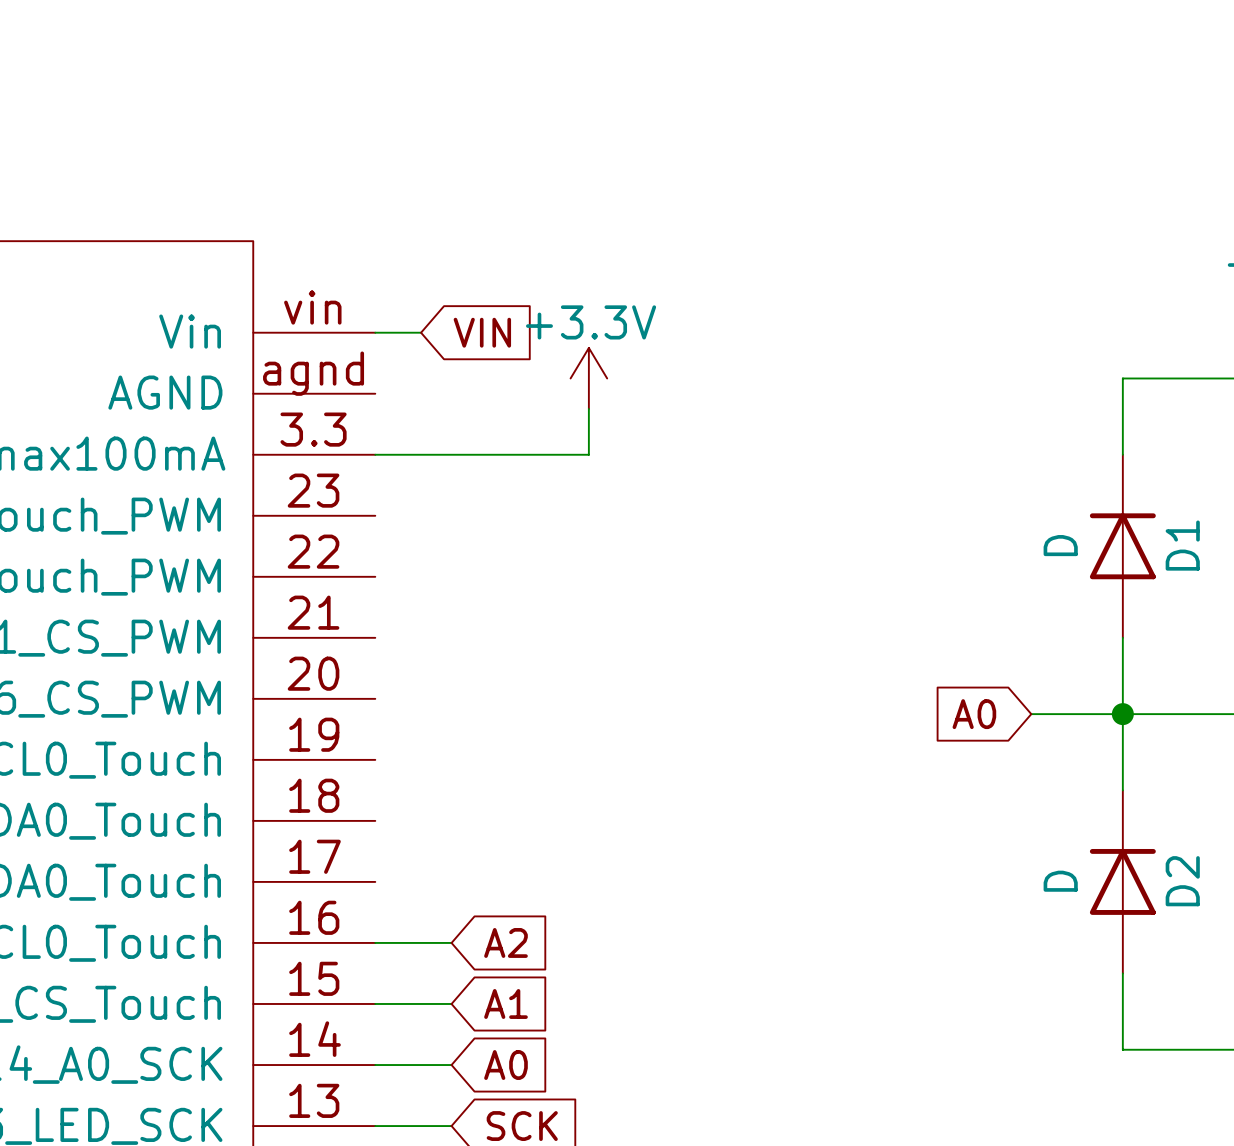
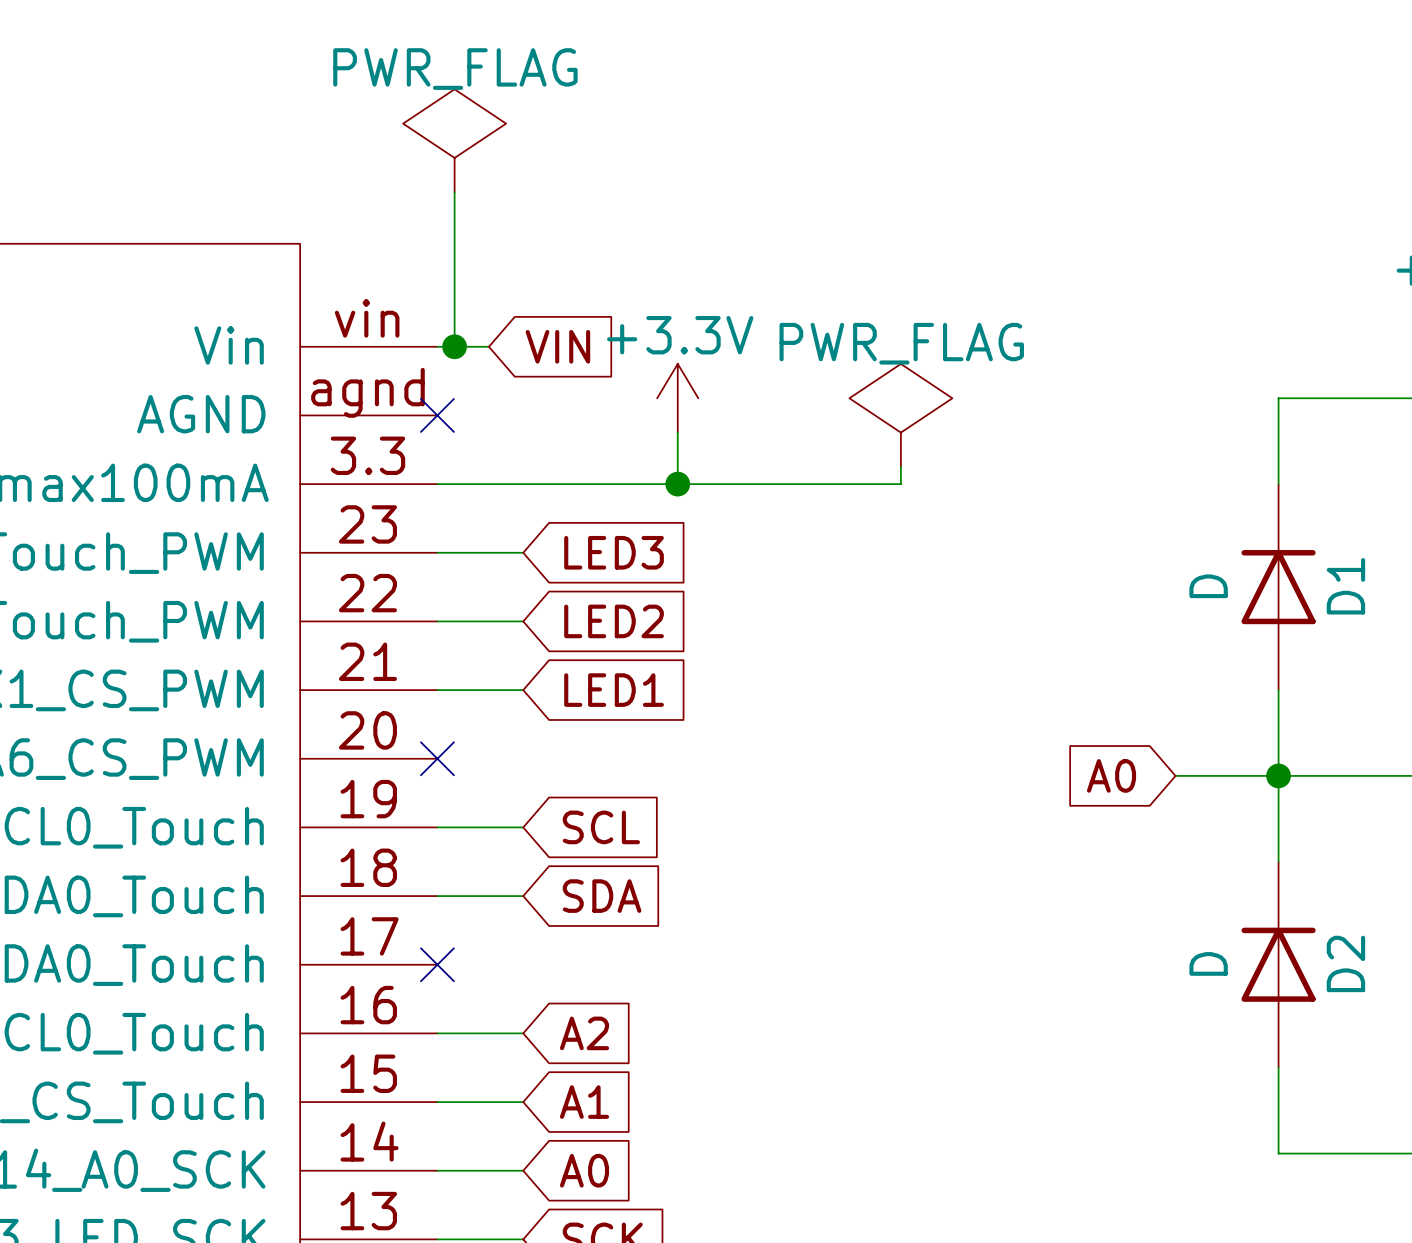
power symbol: none -> PWR_FLAG (454, 140)
wire: none -> (454, 192) (454, 346)
junction: none -> (454, 346)
no-connect mark: none -> (437, 415)
power symbol: none -> PWR_FLAG (900, 415)
wire: none -> (900, 466) (900, 484) (677, 484)
junction: none -> (677, 484)
wire: none -> (437, 552) (523, 552)
global label: none -> LED3 (614, 552)
wire: none -> (437, 621) (523, 621)
global label: none -> LED2 (614, 621)
wire: none -> (437, 690) (523, 690)
global label: none -> LED1 (614, 690)
no-connect mark: none -> (437, 758)
wire: none -> (437, 827) (523, 827)
global label: none -> SCL (601, 827)
wire: none -> (437, 896) (523, 896)
global label: none -> SDA (602, 896)
no-connect mark: none -> (437, 964)

